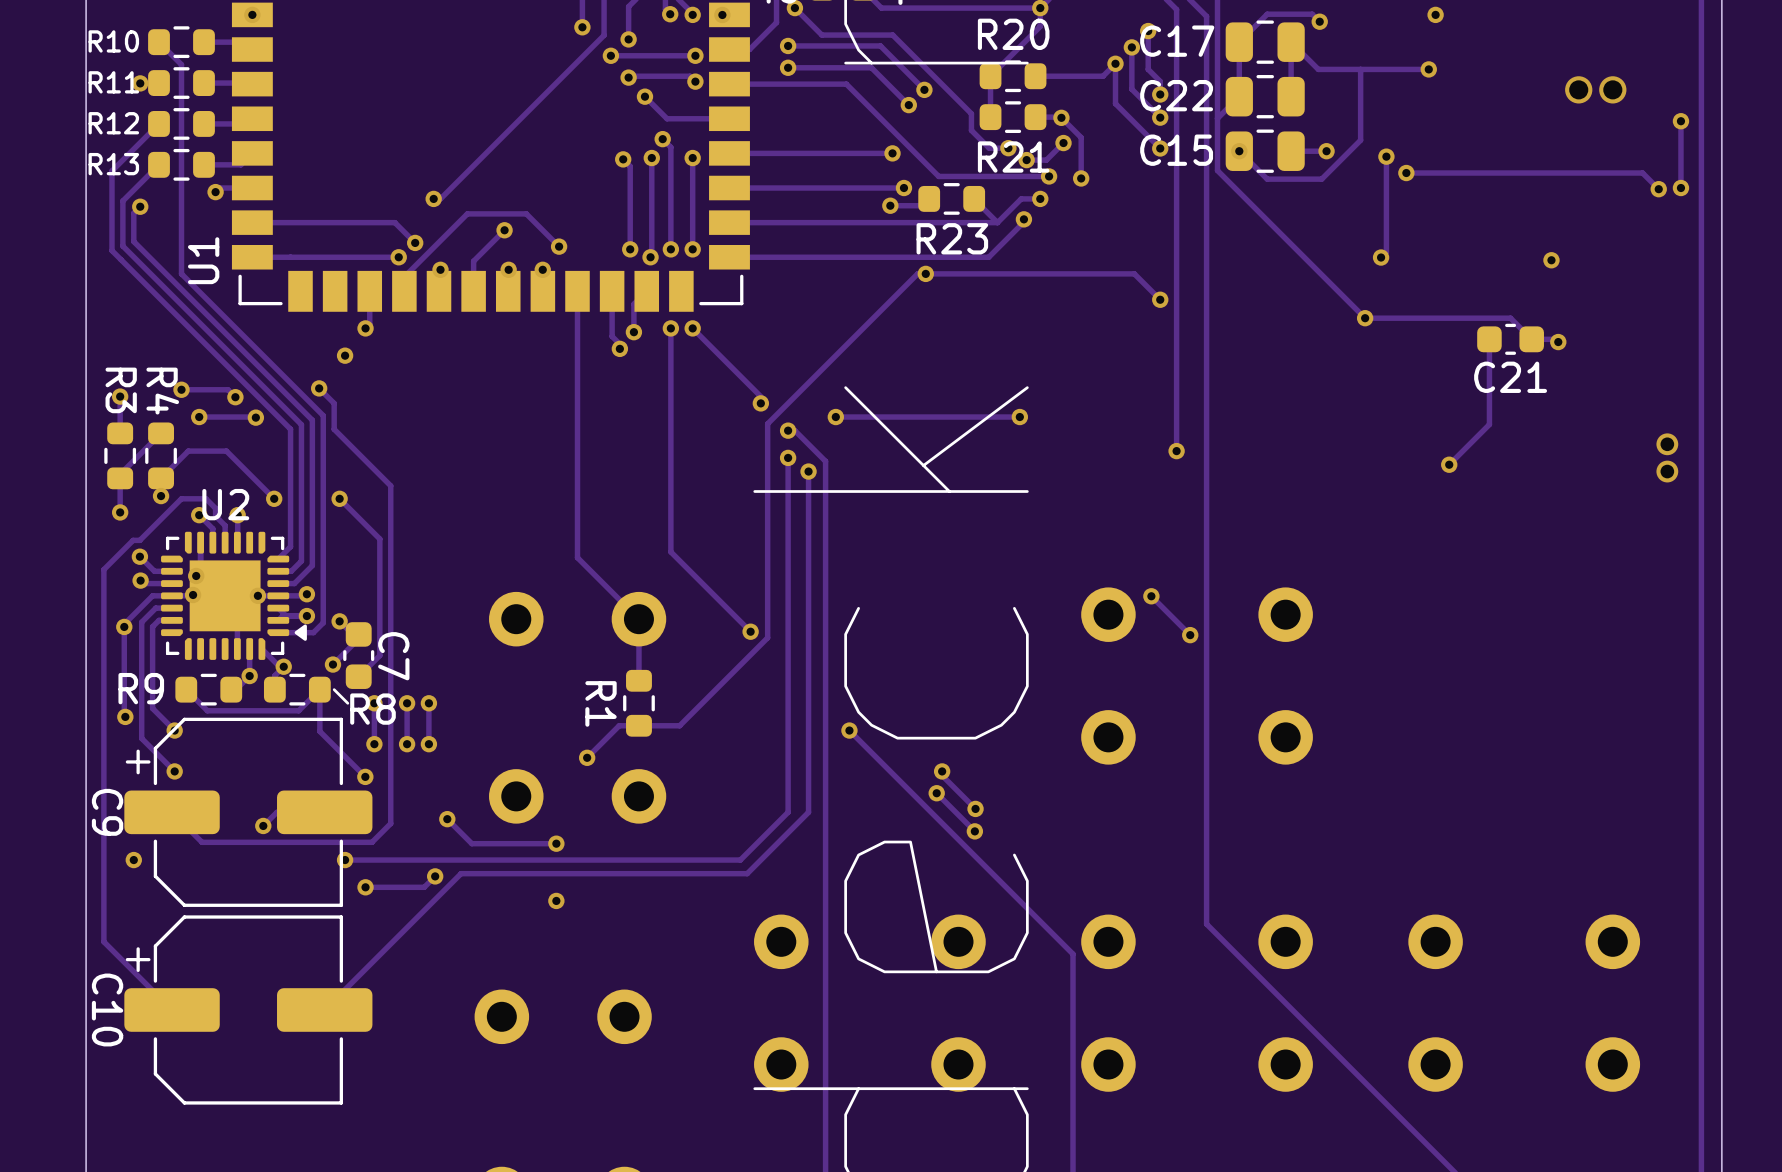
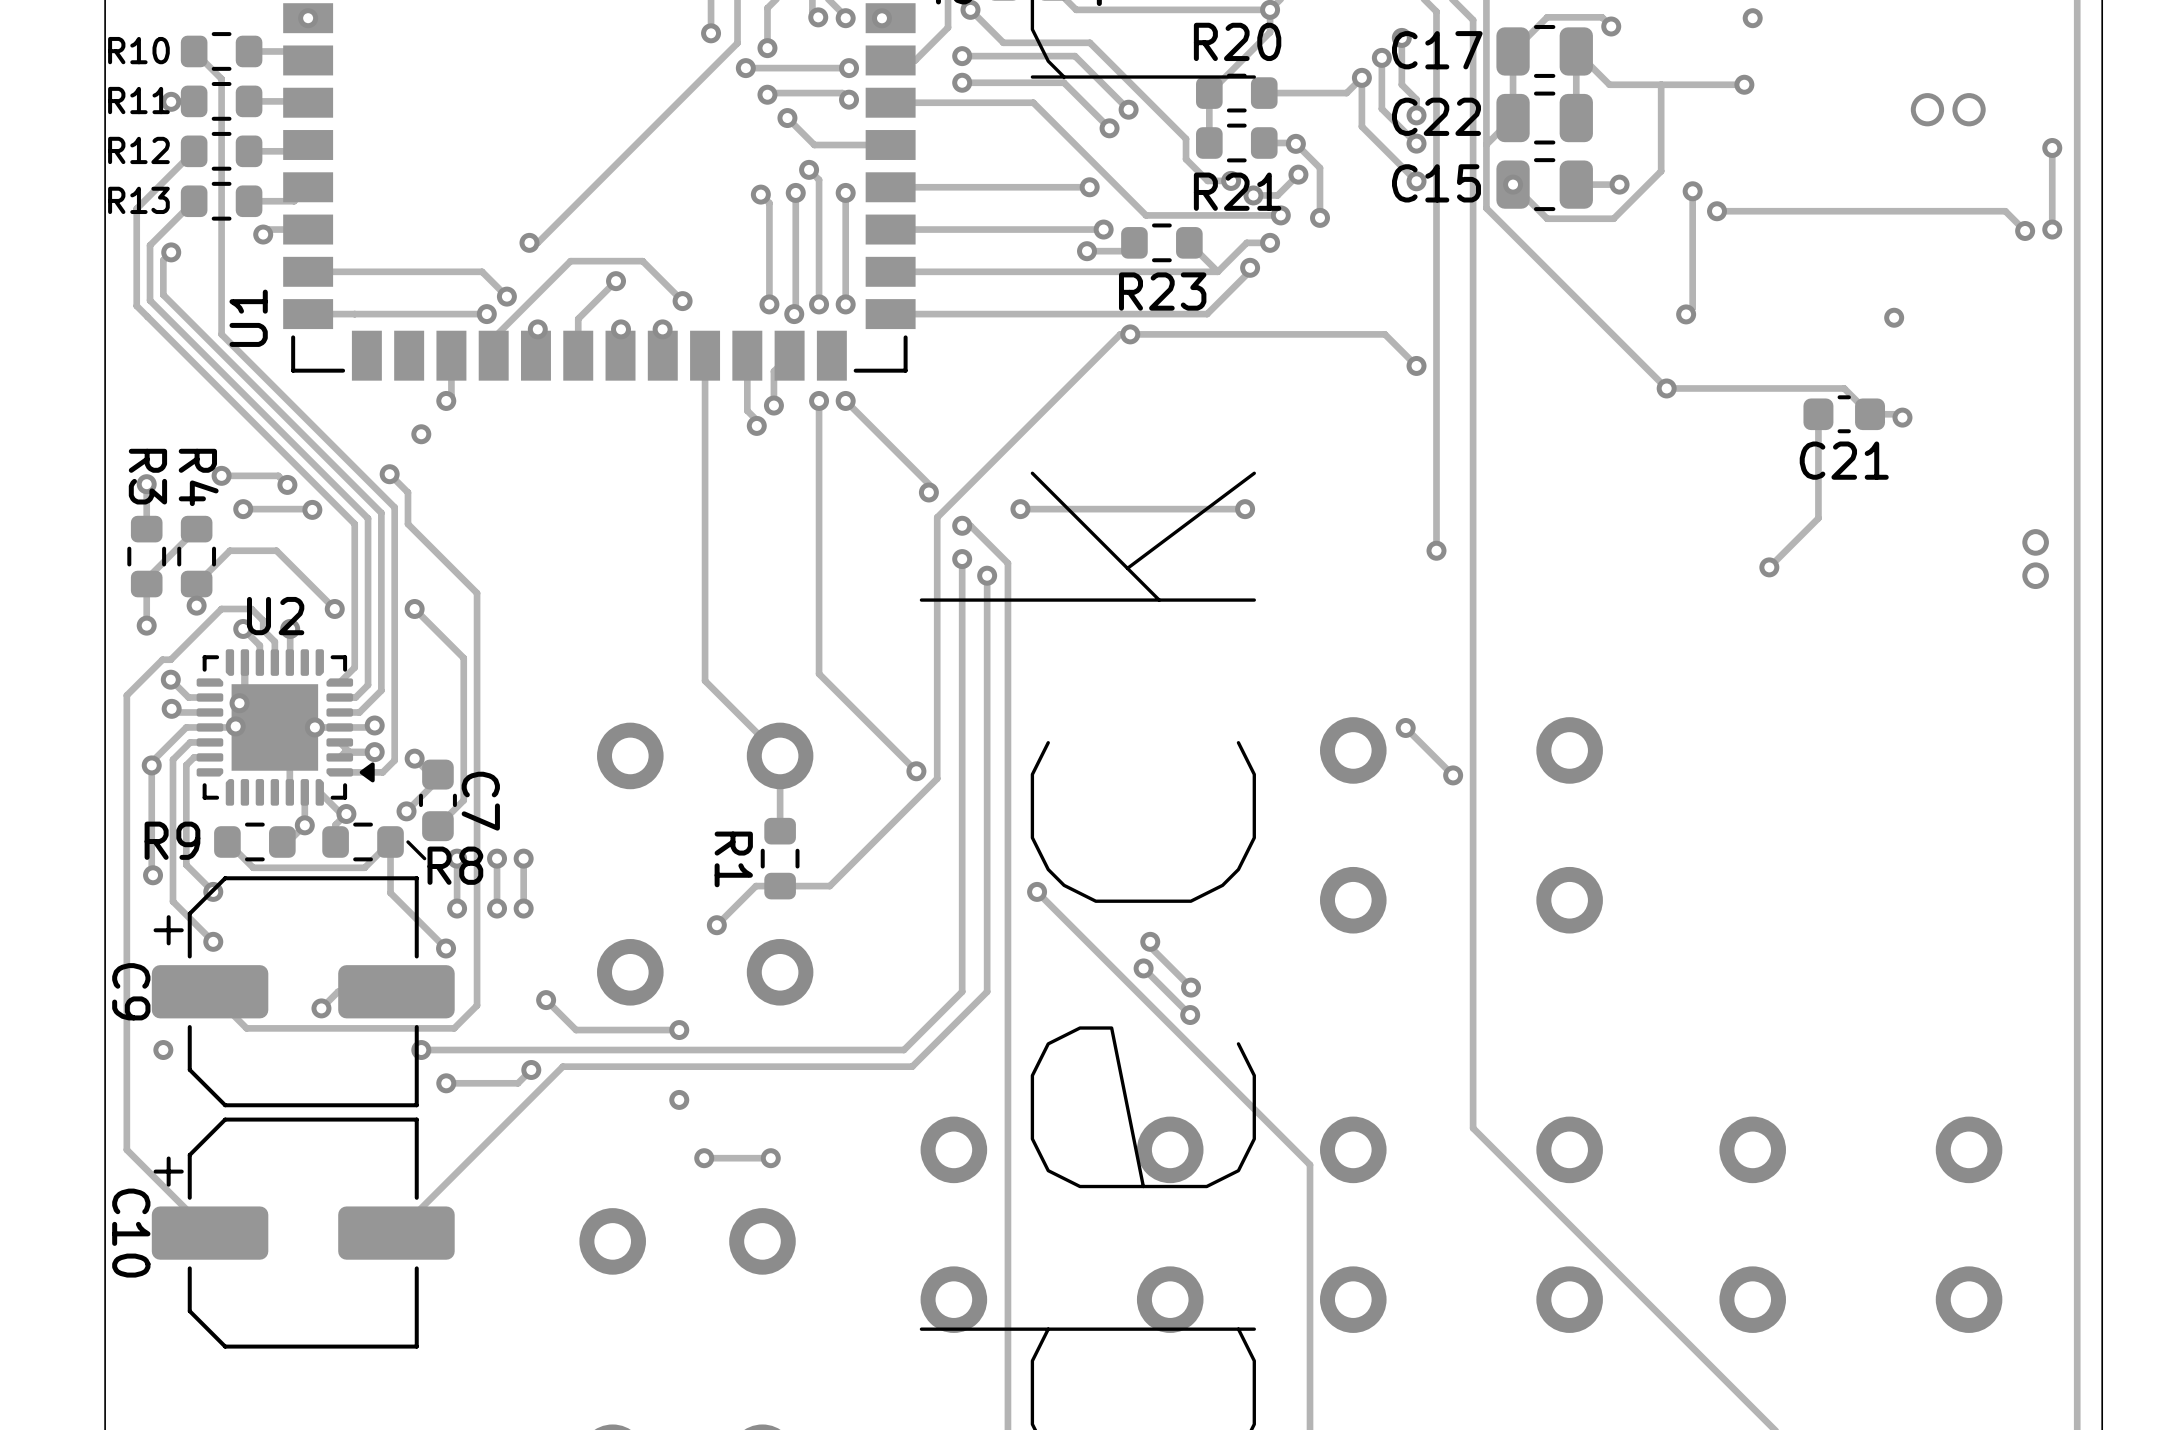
via: none -> (704, 1158)
track: none -> (770, 1158) (704, 1158)
via: none -> (770, 1158)

